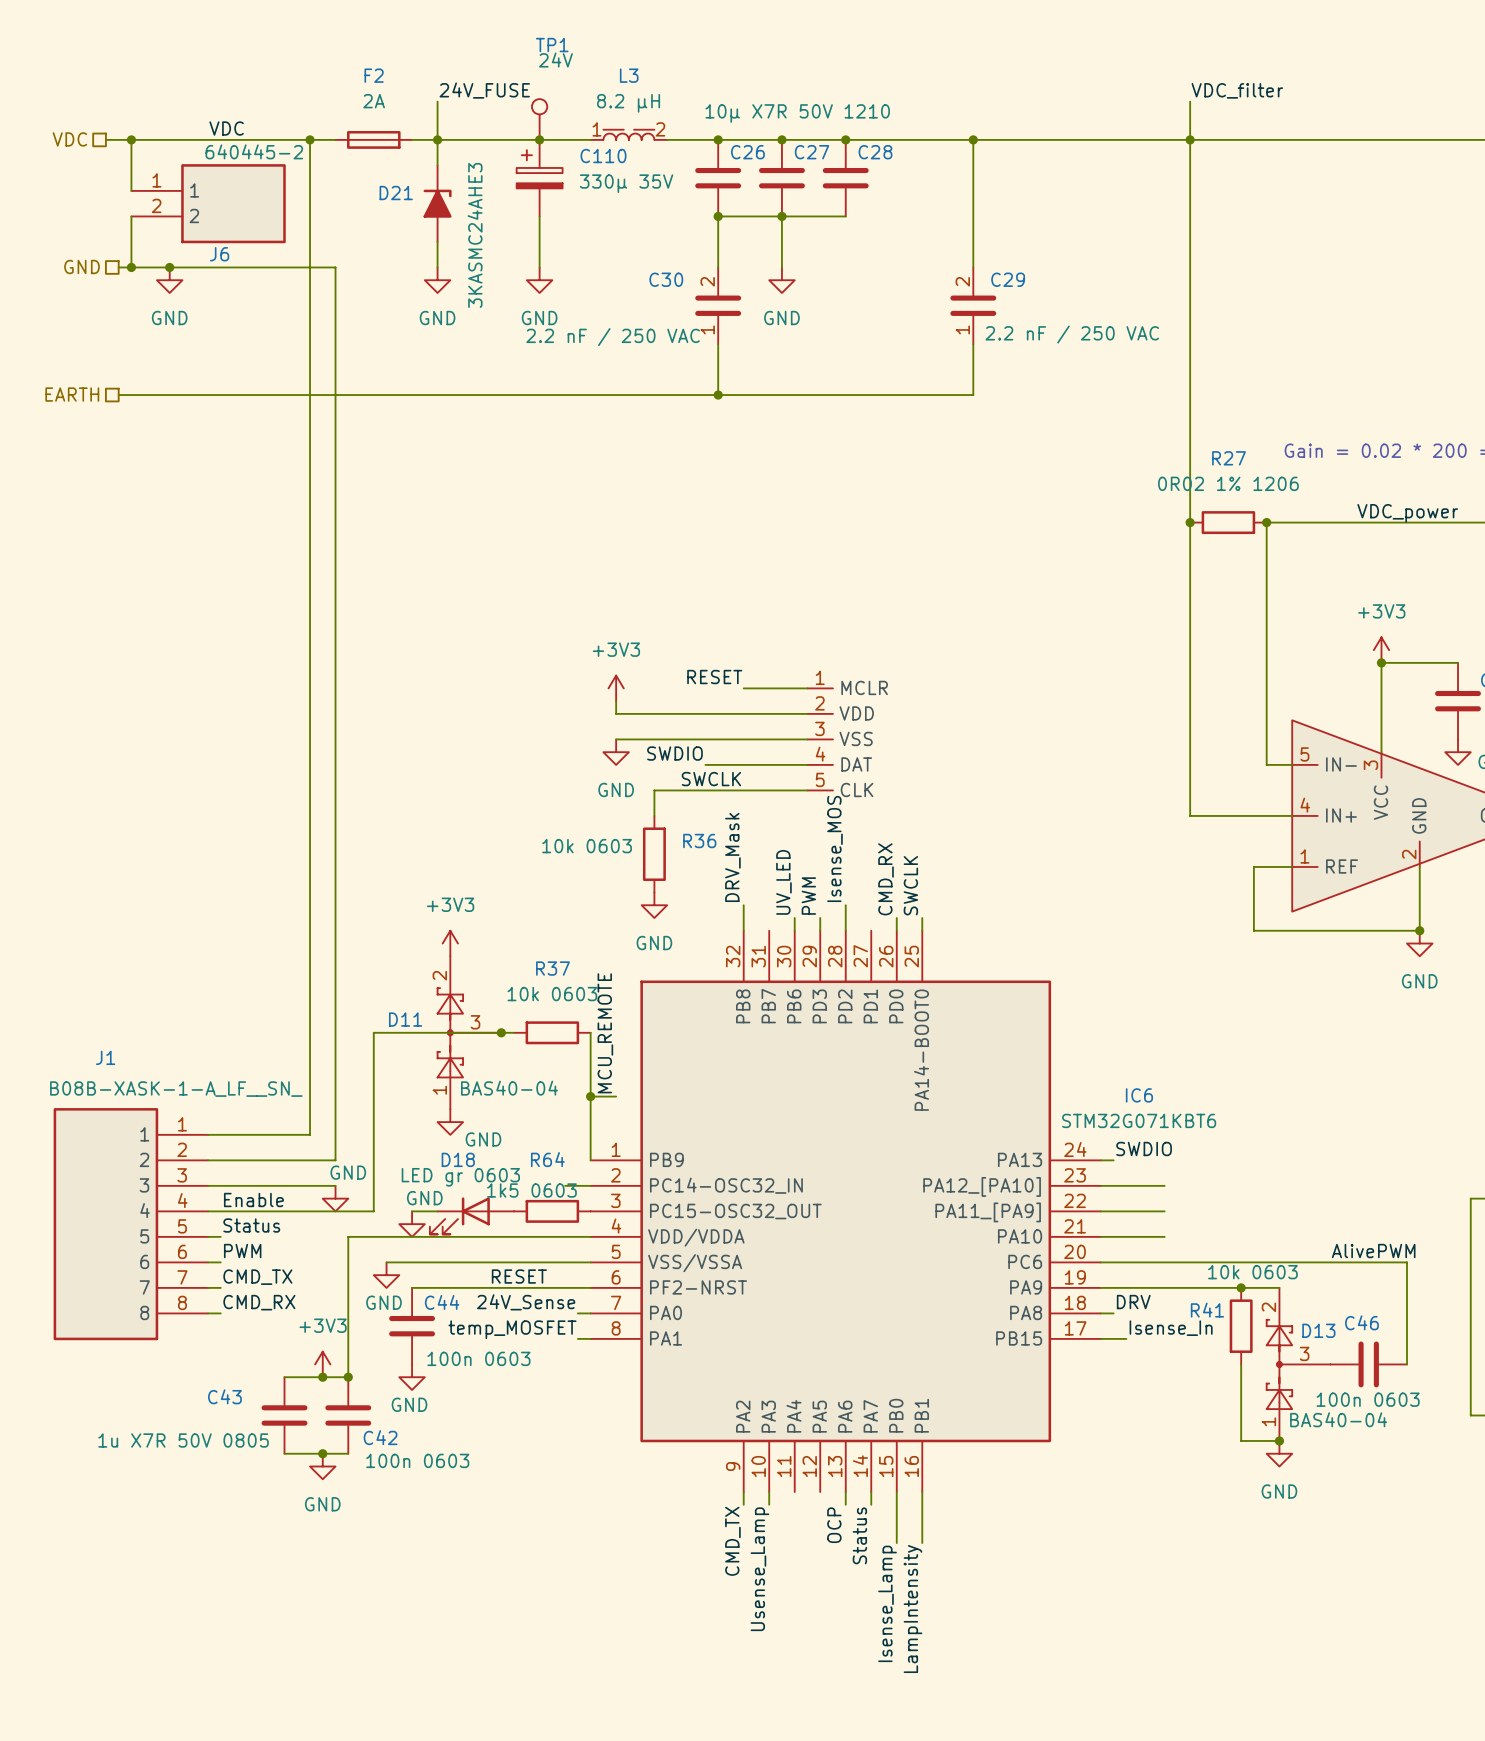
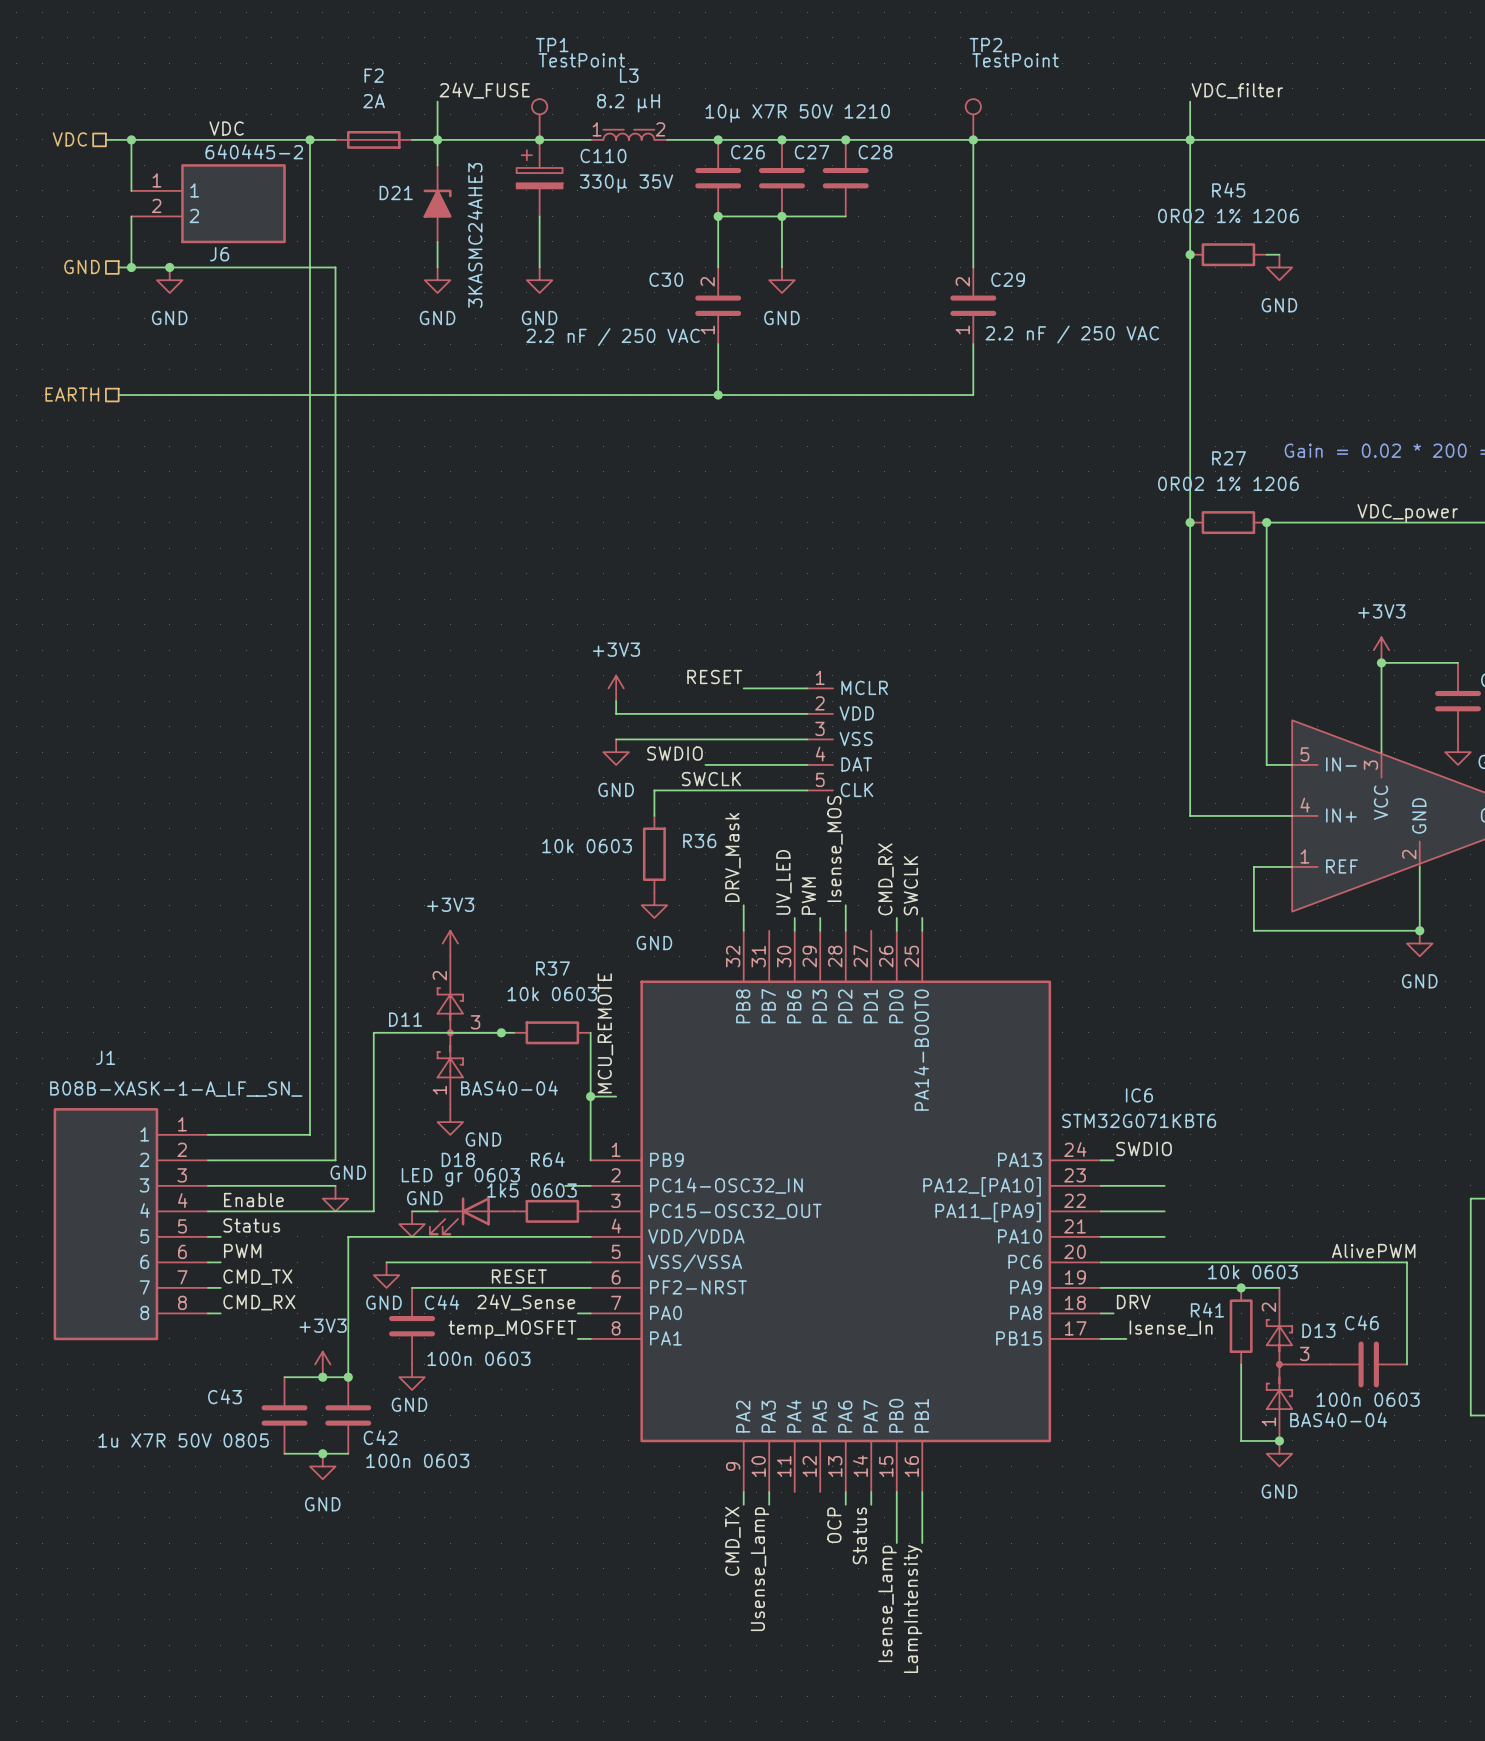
TP1 value: 24V (555, 60) -> TestPoint (581, 60)
TP2: none -> TestPoint (973, 119)
junction: none -> (1190, 254)
R45: none -> 0R02 1% 1206 (1228, 254)
wire: none -> (1266, 254) (1279, 254)
power symbol: none -> GND (1279, 267)

